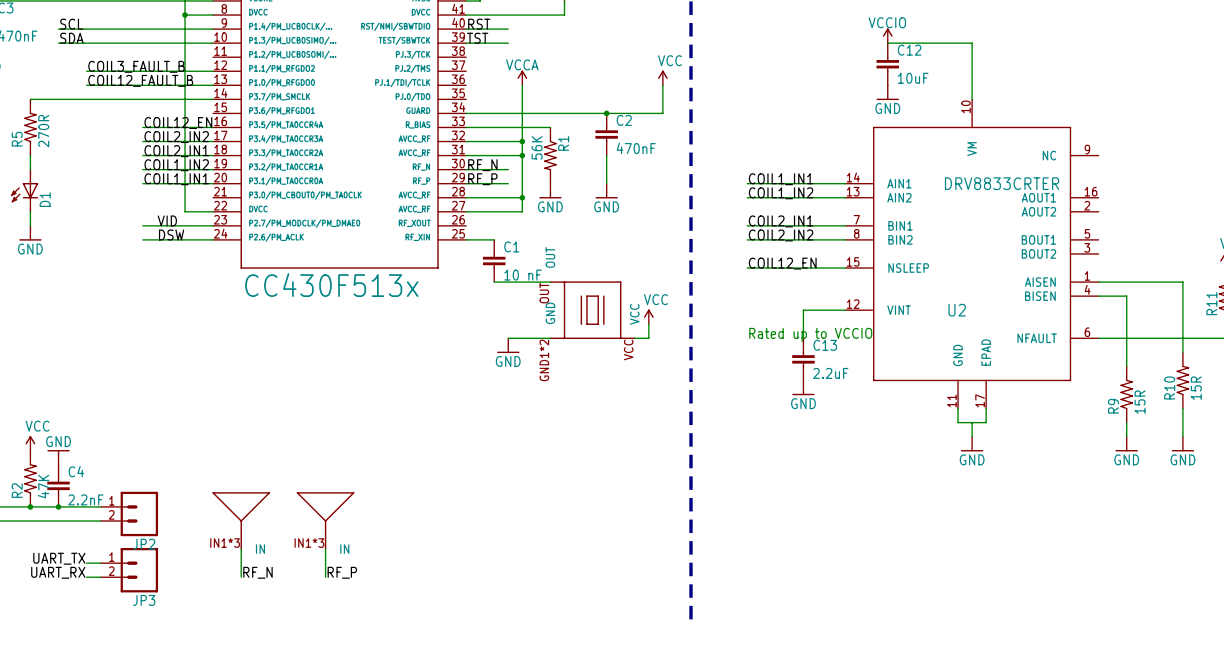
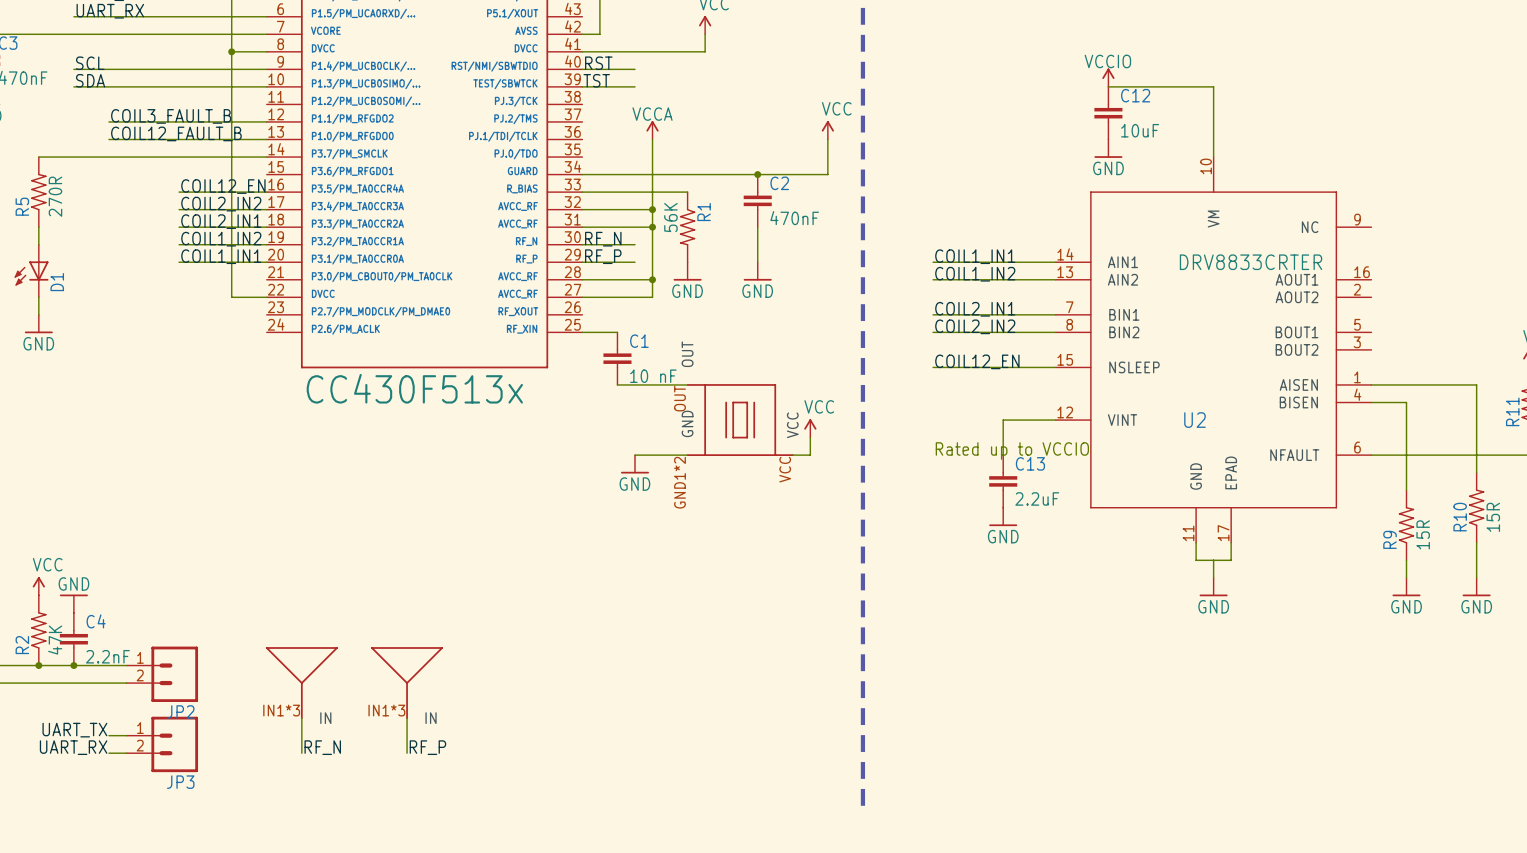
label: VID (167, 220) -> none
wire: (142, 225) (213, 225) -> none
label: DSW (171, 234) -> none
wire: (142, 239) (213, 239) -> none

